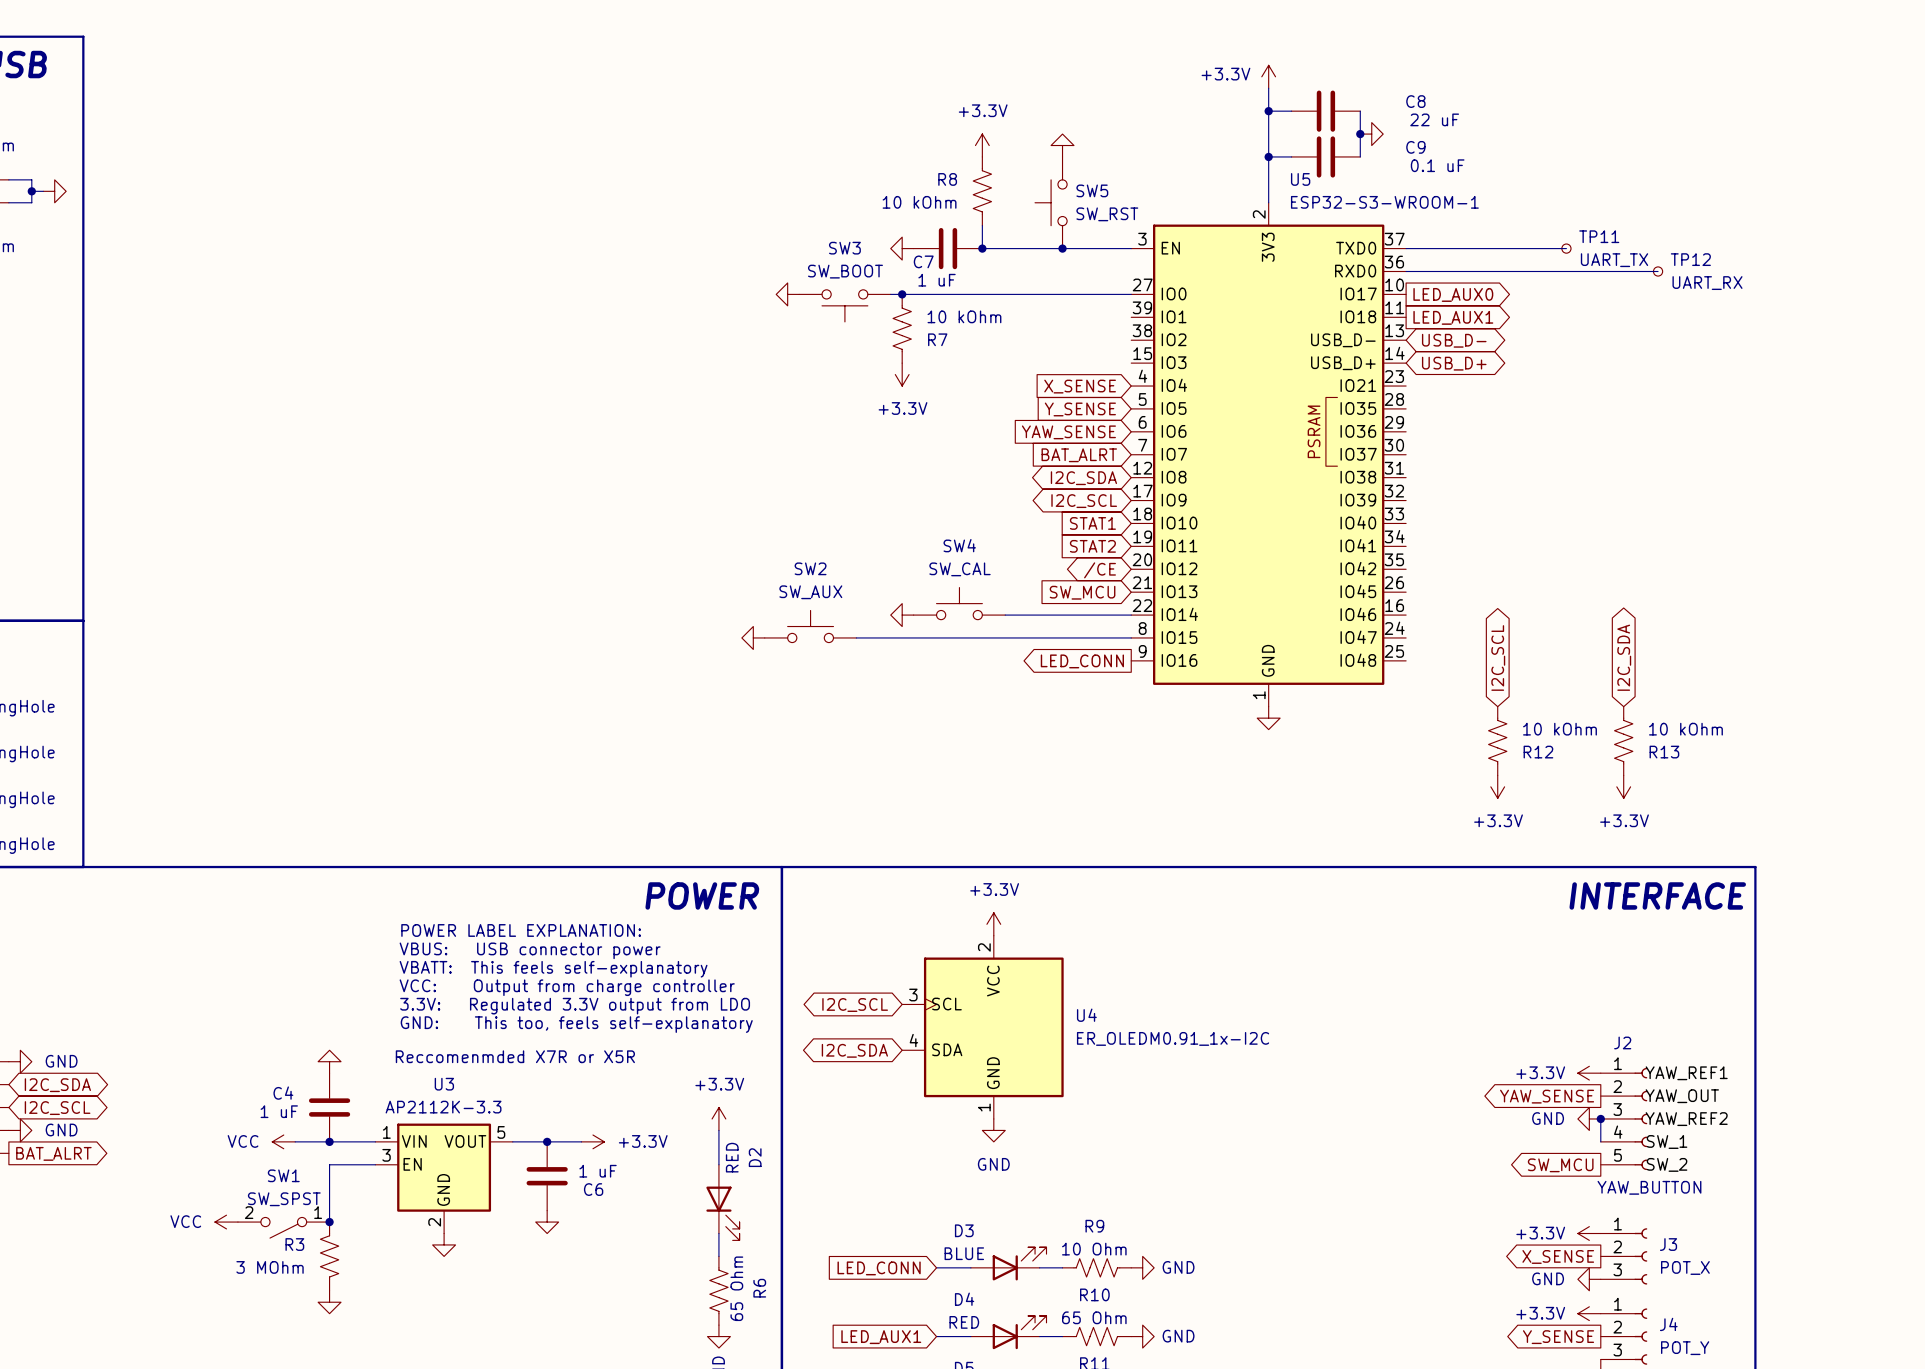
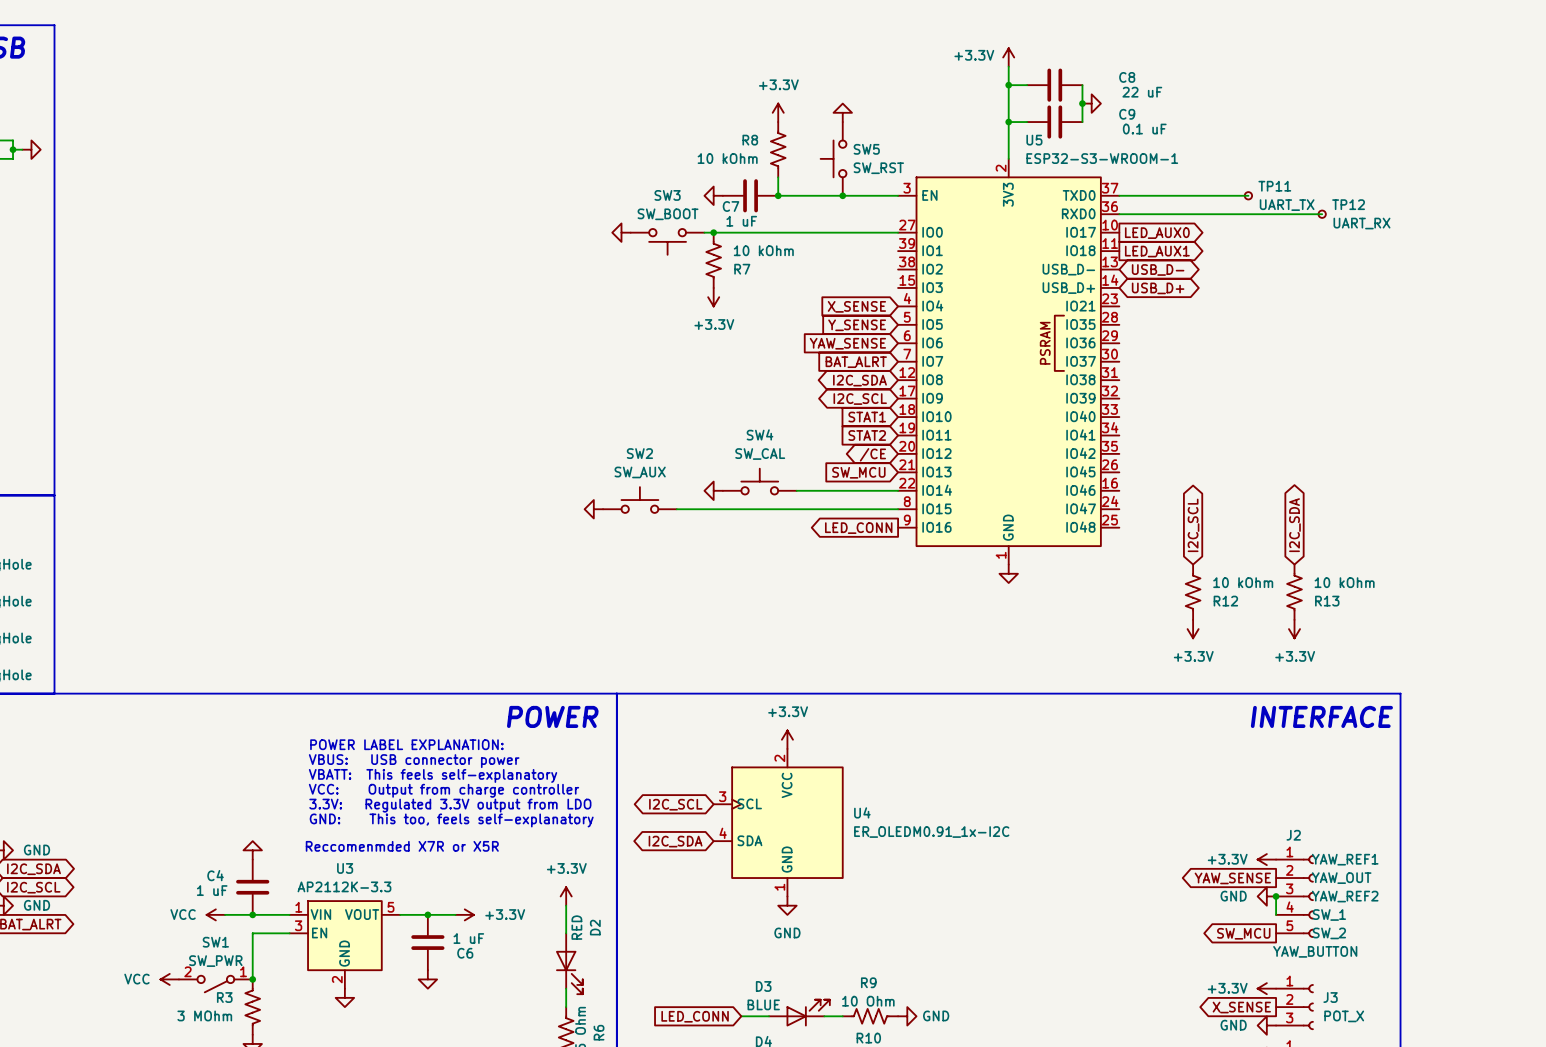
SW1 value: SW_SPST (284, 1199) -> SW_PWR (215, 961)

